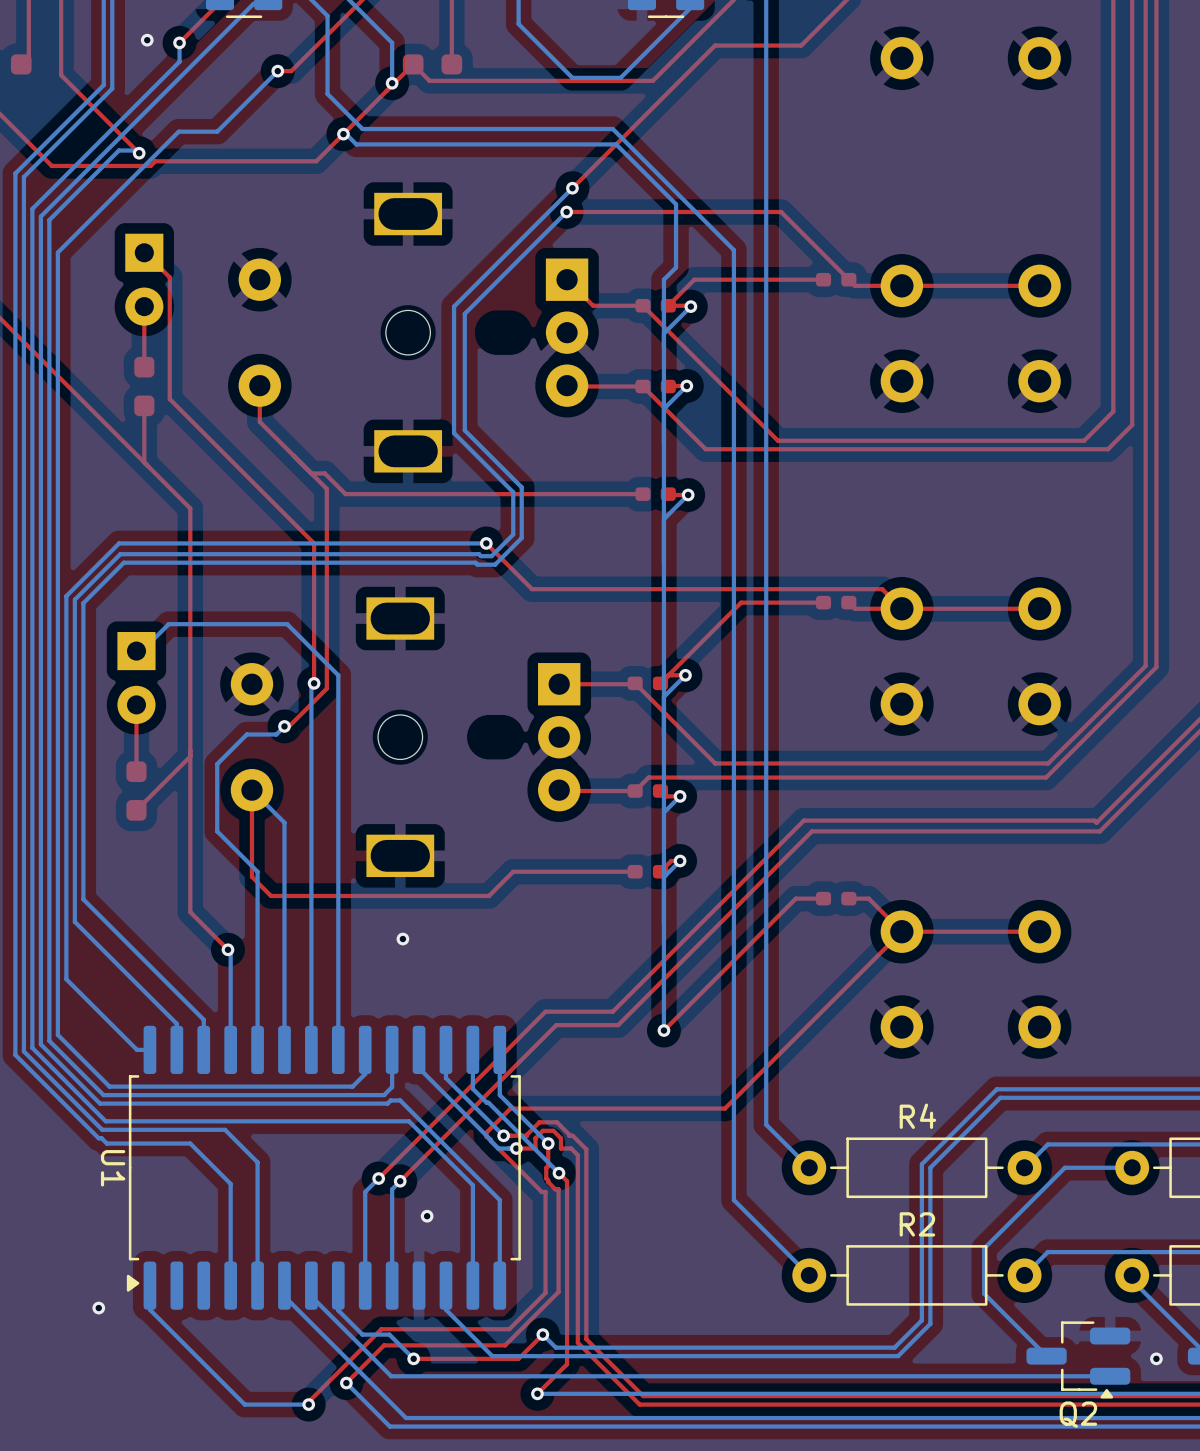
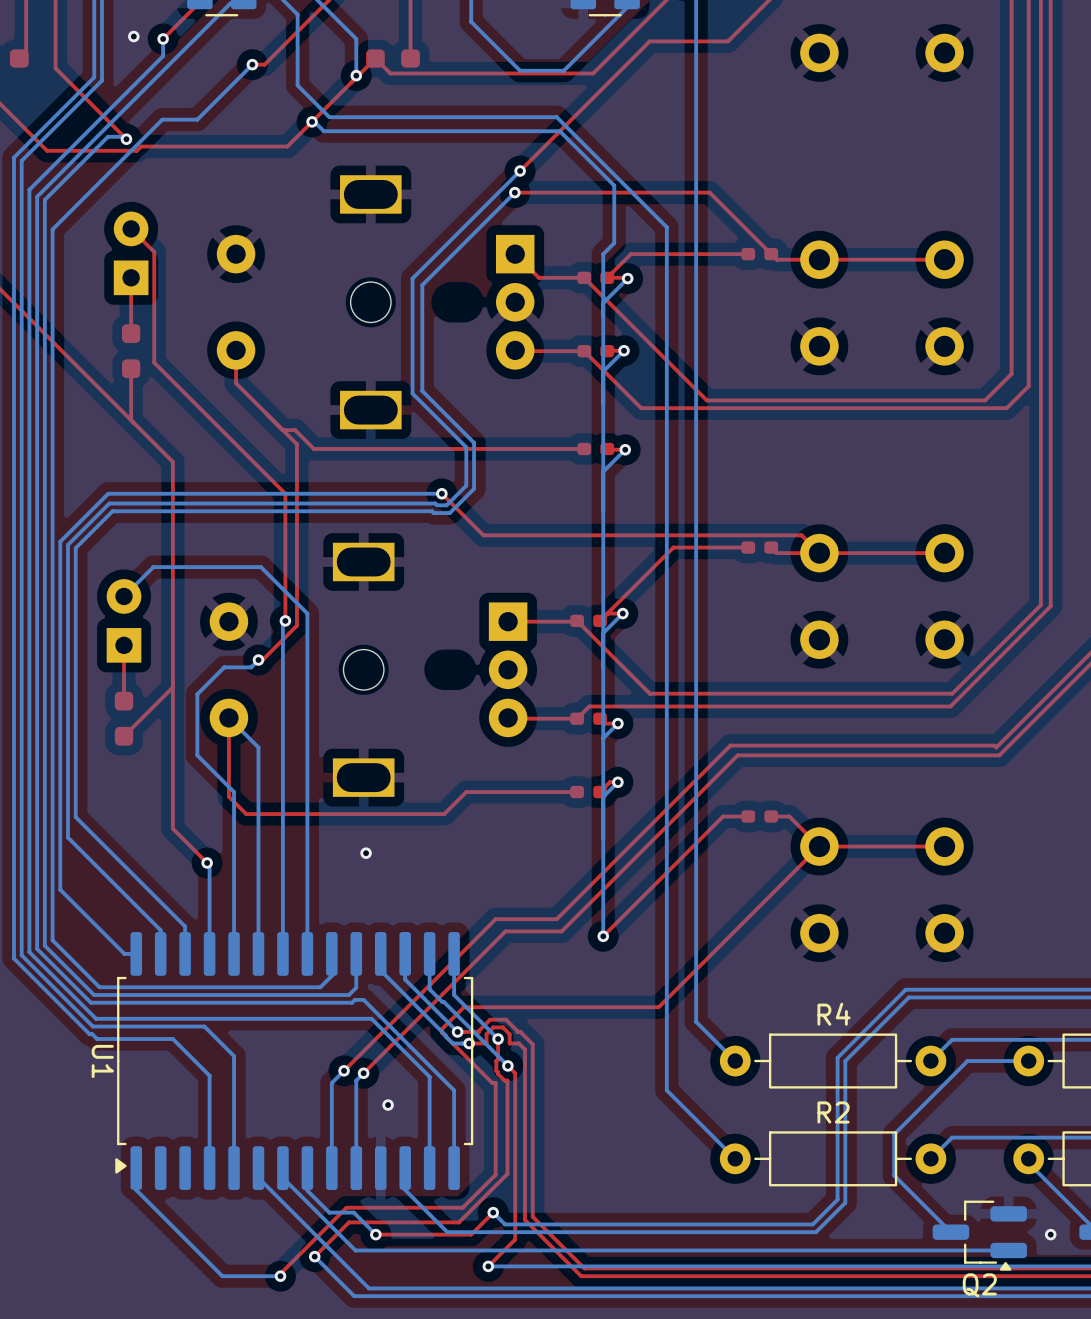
part rotation: 0° (144, 279) -> 180° (131, 253)
part rotation: 0° (136, 677) -> 180° (124, 620)
via: (98, 1308) -> none

